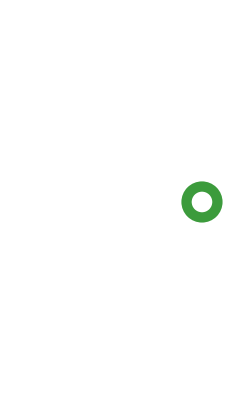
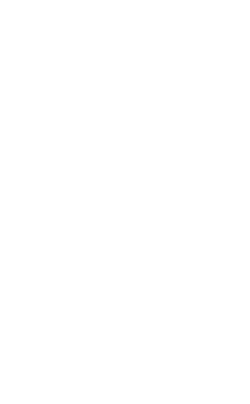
via: (201, 201) -> none

